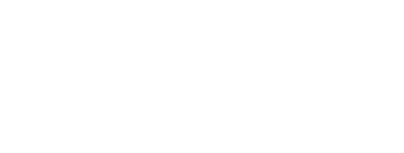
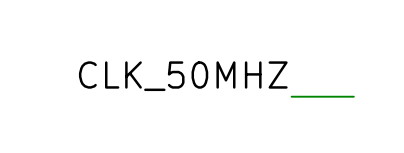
label: none -> CLK_50MHZ (183, 76)
wire: none -> (291, 96) (353, 96)

